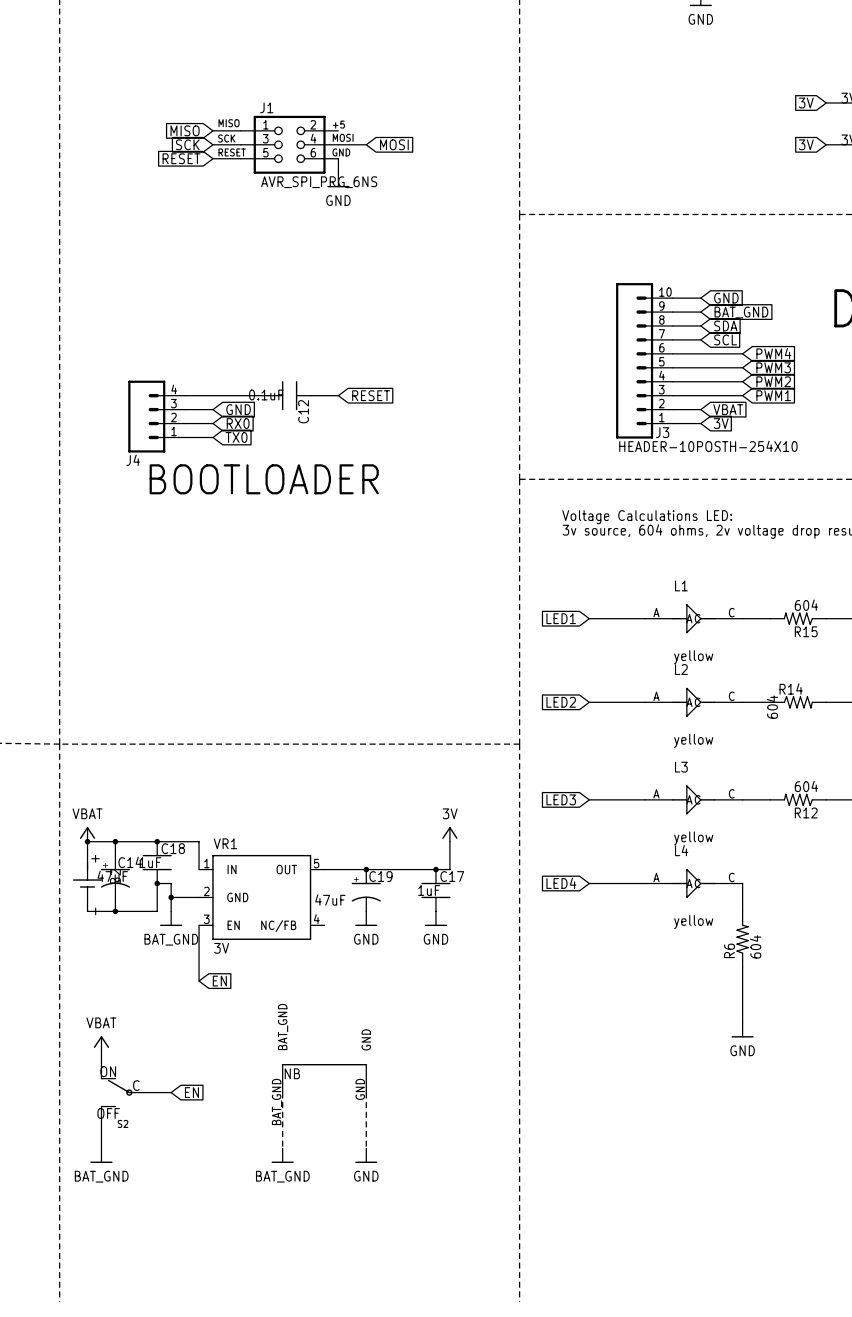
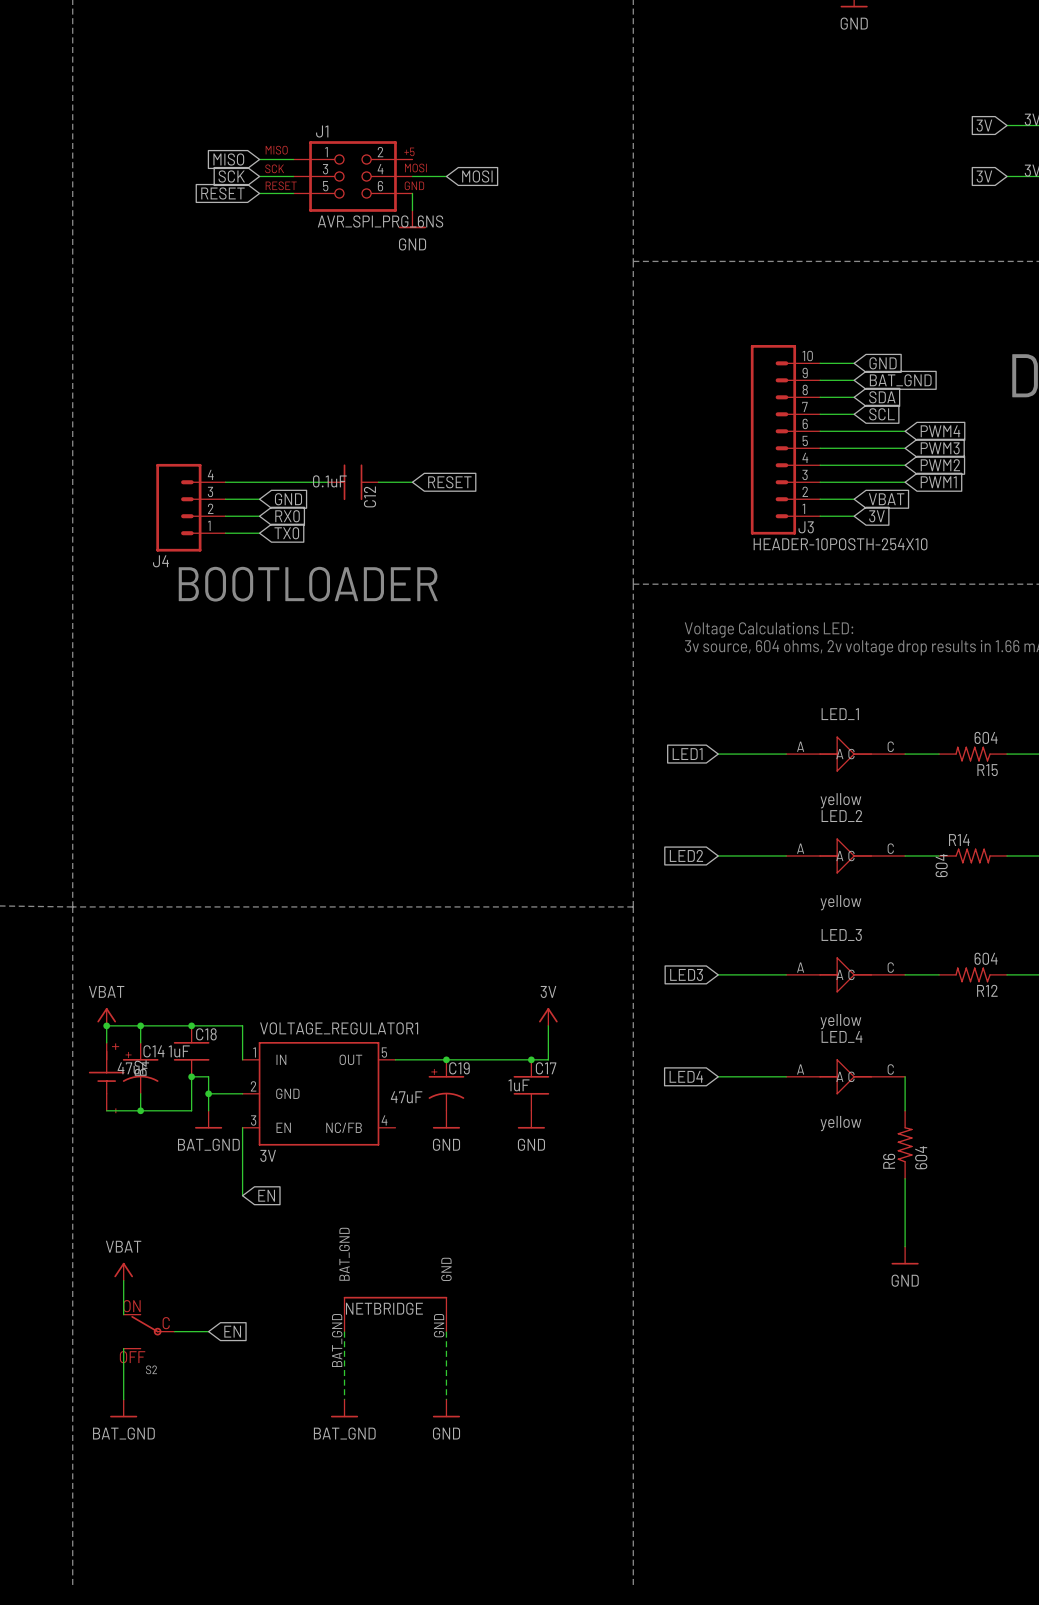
L1 name: L1 (681, 585) -> LED_1 (840, 714)
L2 name: L2 (681, 669) -> LED_2 (841, 816)
L3 name: L3 (681, 767) -> LED_3 (841, 935)
VR1 name: VR1 (225, 843) -> VOLTAGE_REGULATOR1 (339, 1028)
L4 name: L4 (681, 850) -> LED_4 (842, 1036)
NB name: NB (292, 1073) -> NETBRIDGE (384, 1308)

